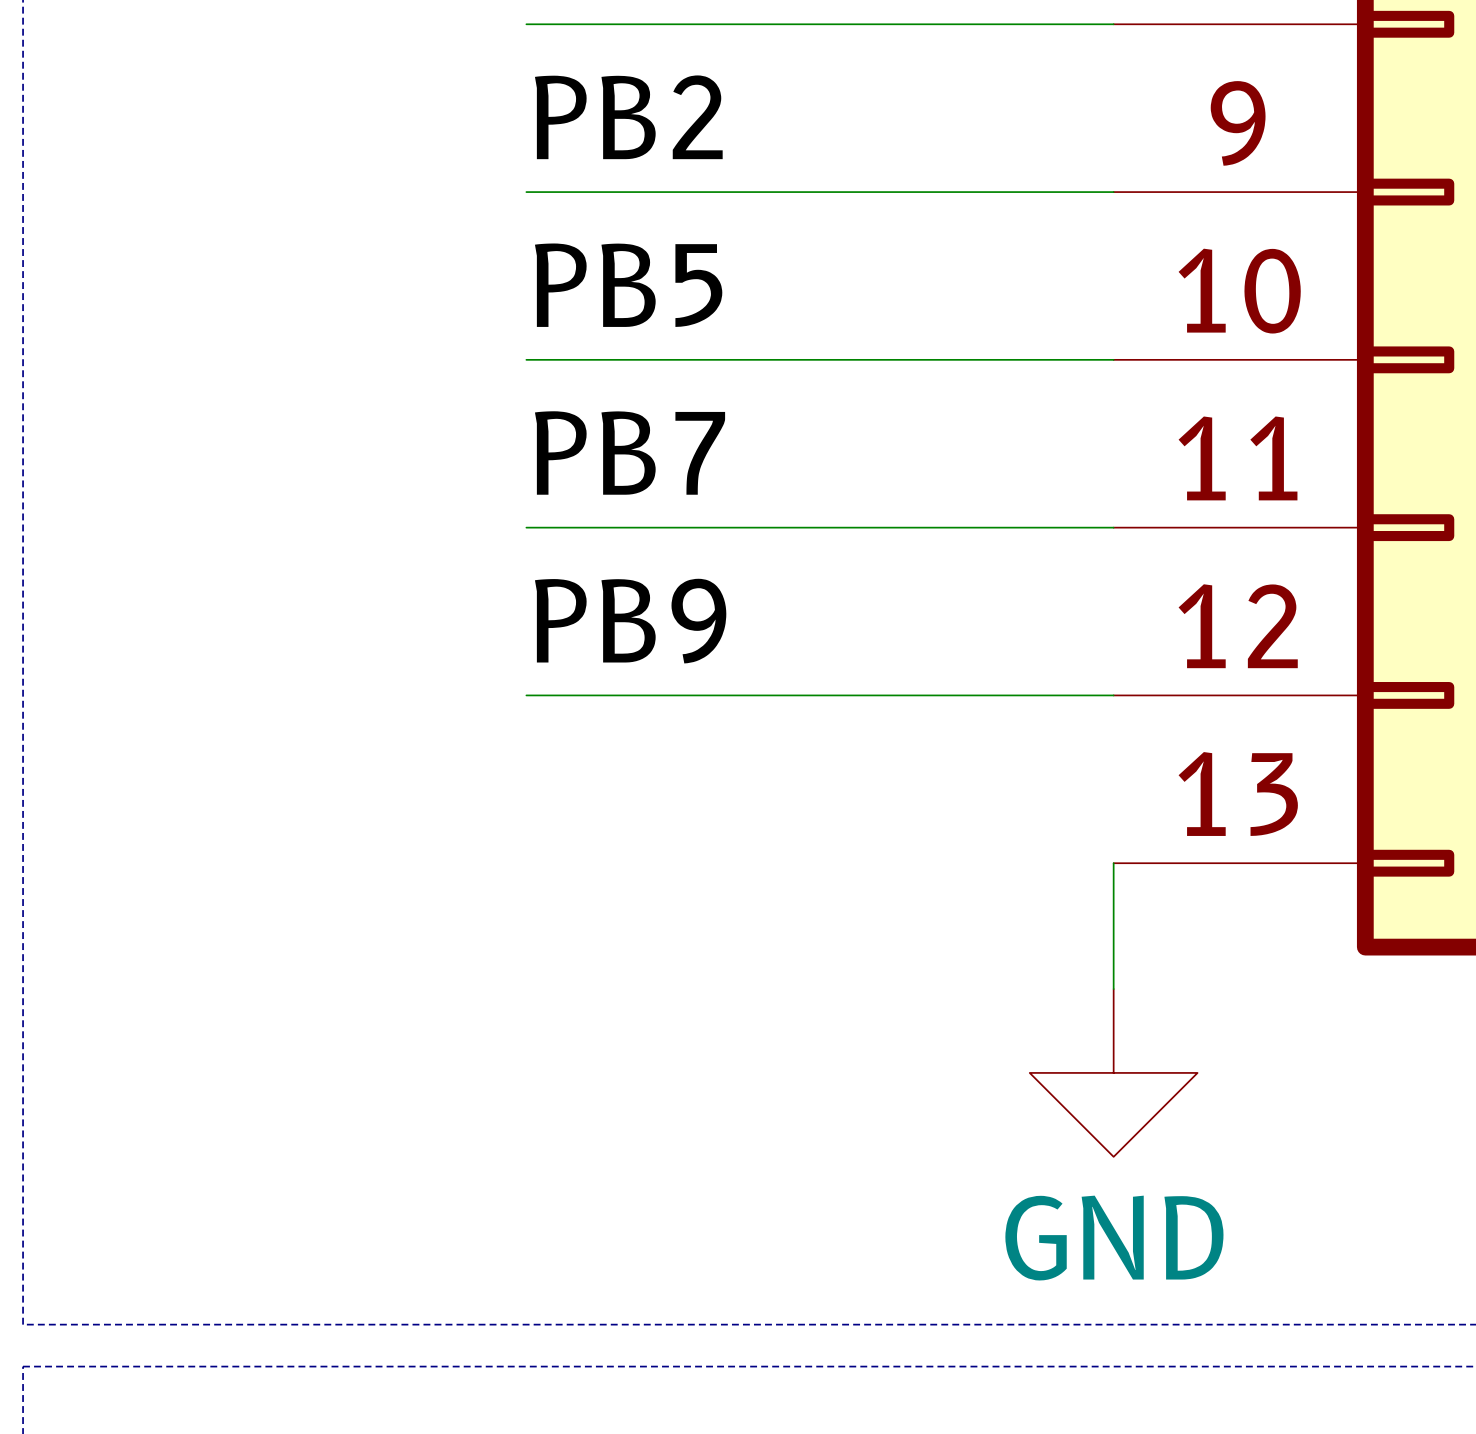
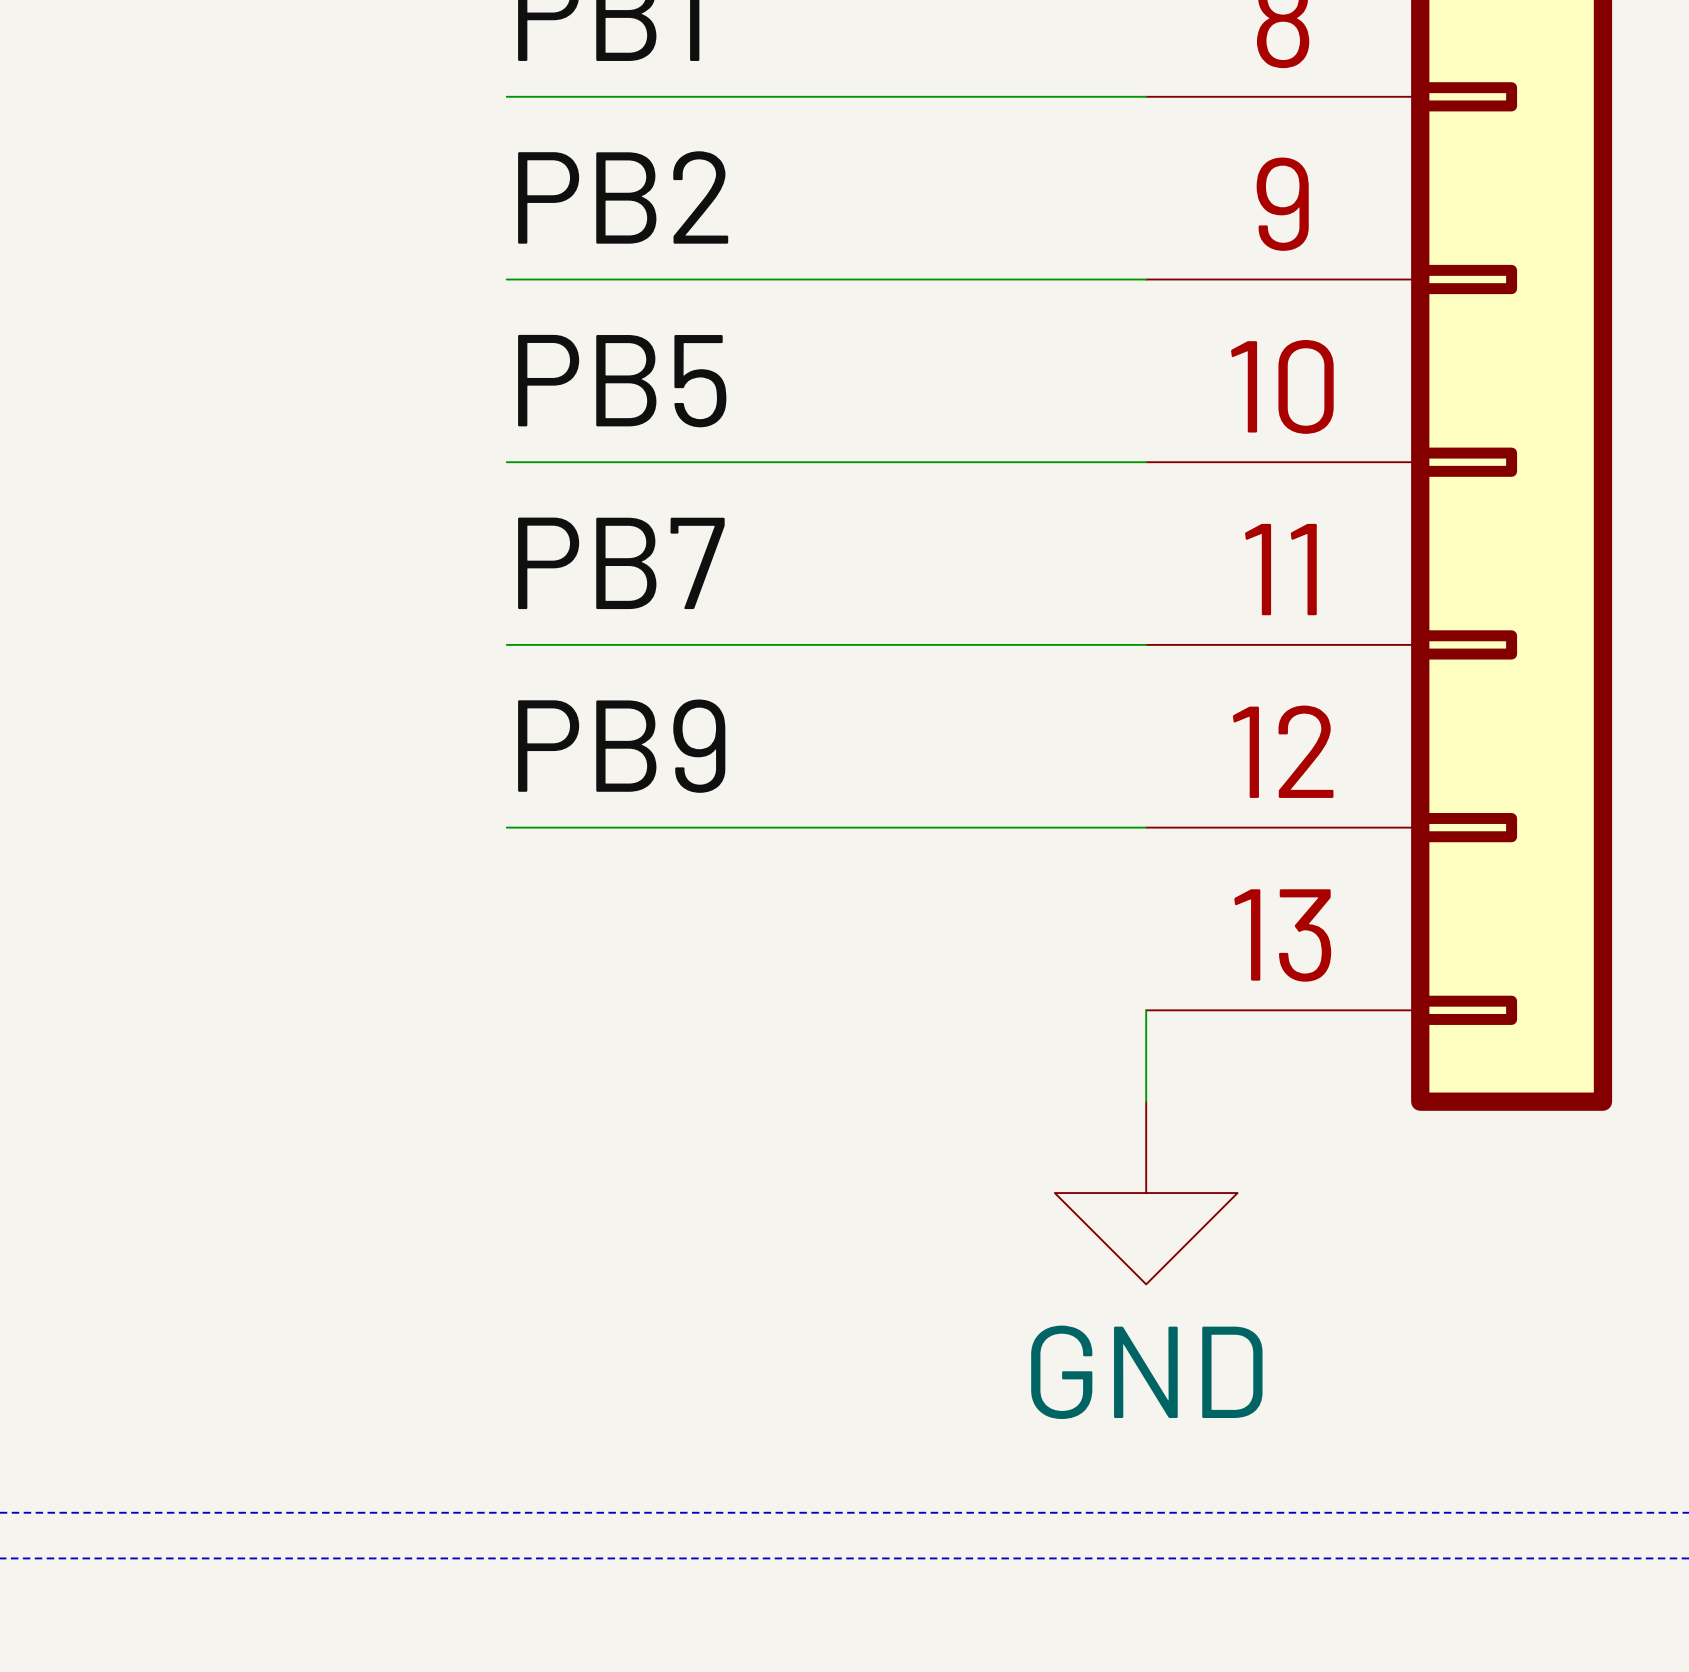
power symbol position: GND (1113, 1072) -> GND (1146, 1193)

